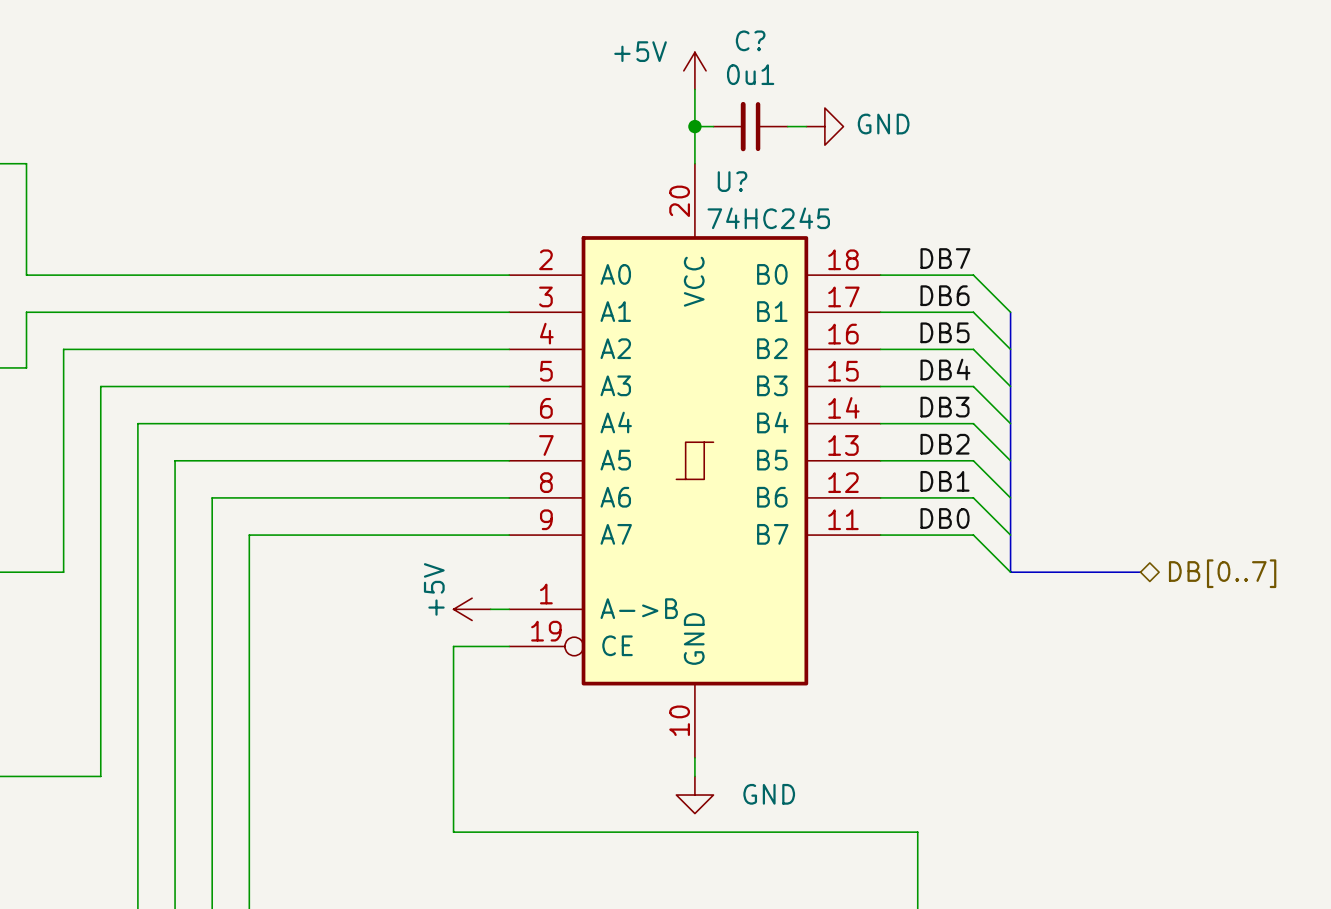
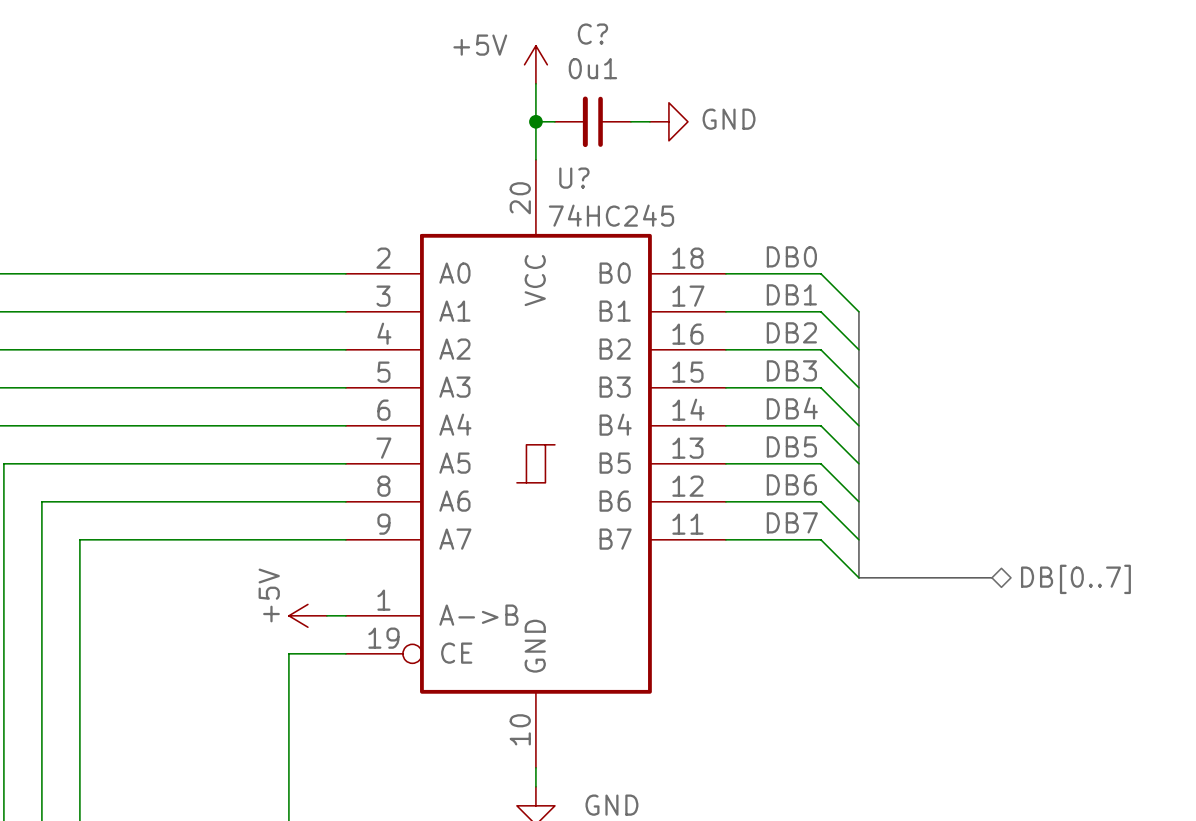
label: DB7 (945, 258) -> DB0 (791, 256)
label: DB6 (945, 295) -> DB1 (791, 294)
label: DB5 (945, 332) -> DB2 (791, 332)
label: DB4 (945, 369) -> DB3 (791, 370)
label: DB3 (945, 407) -> DB4 (792, 408)
label: DB2 (945, 444) -> DB5 (791, 446)
label: DB1 (945, 481) -> DB6 (791, 484)
label: DB0 (945, 518) -> DB7 (792, 522)

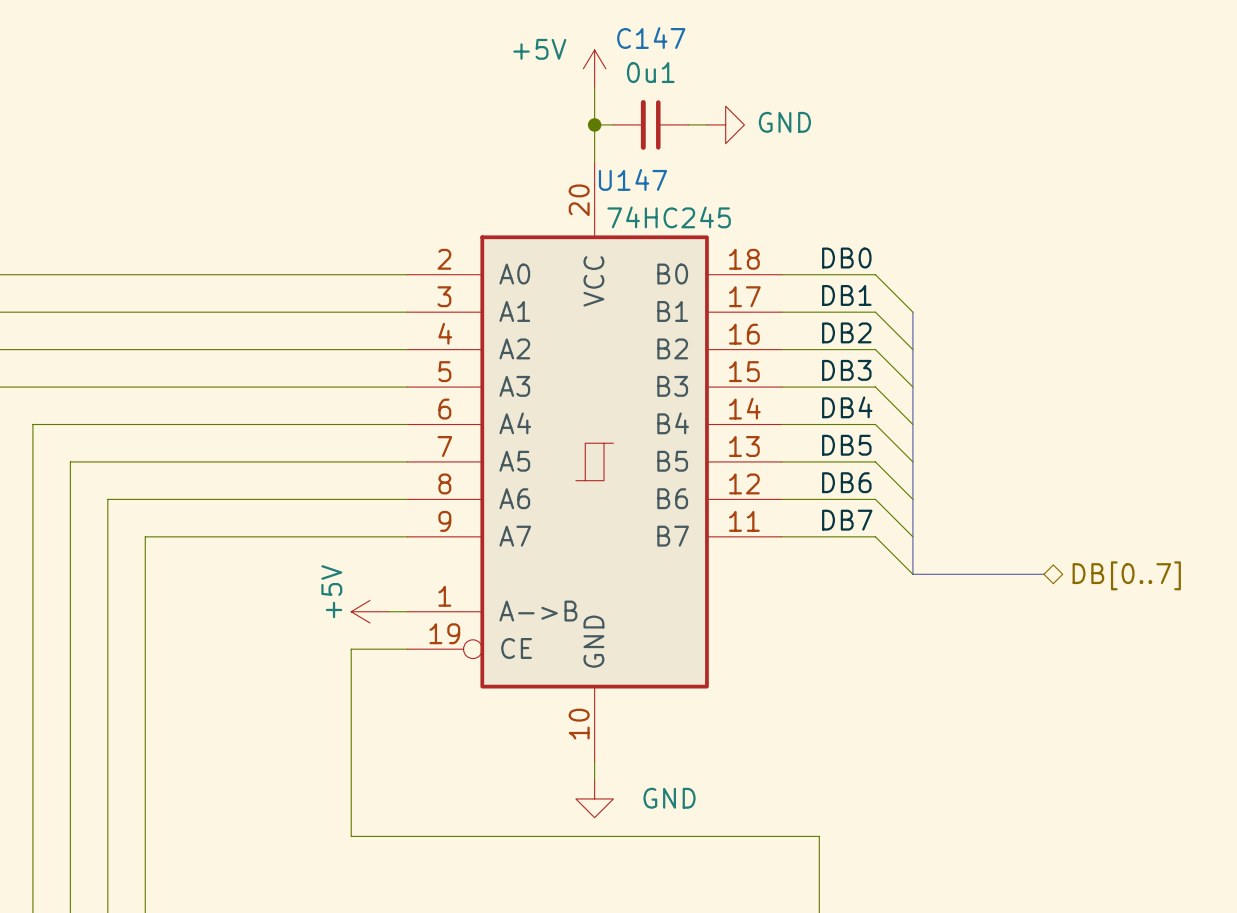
C? name: C? (592, 34) -> C147 (651, 38)
U? name: U? (574, 178) -> U147 (632, 179)

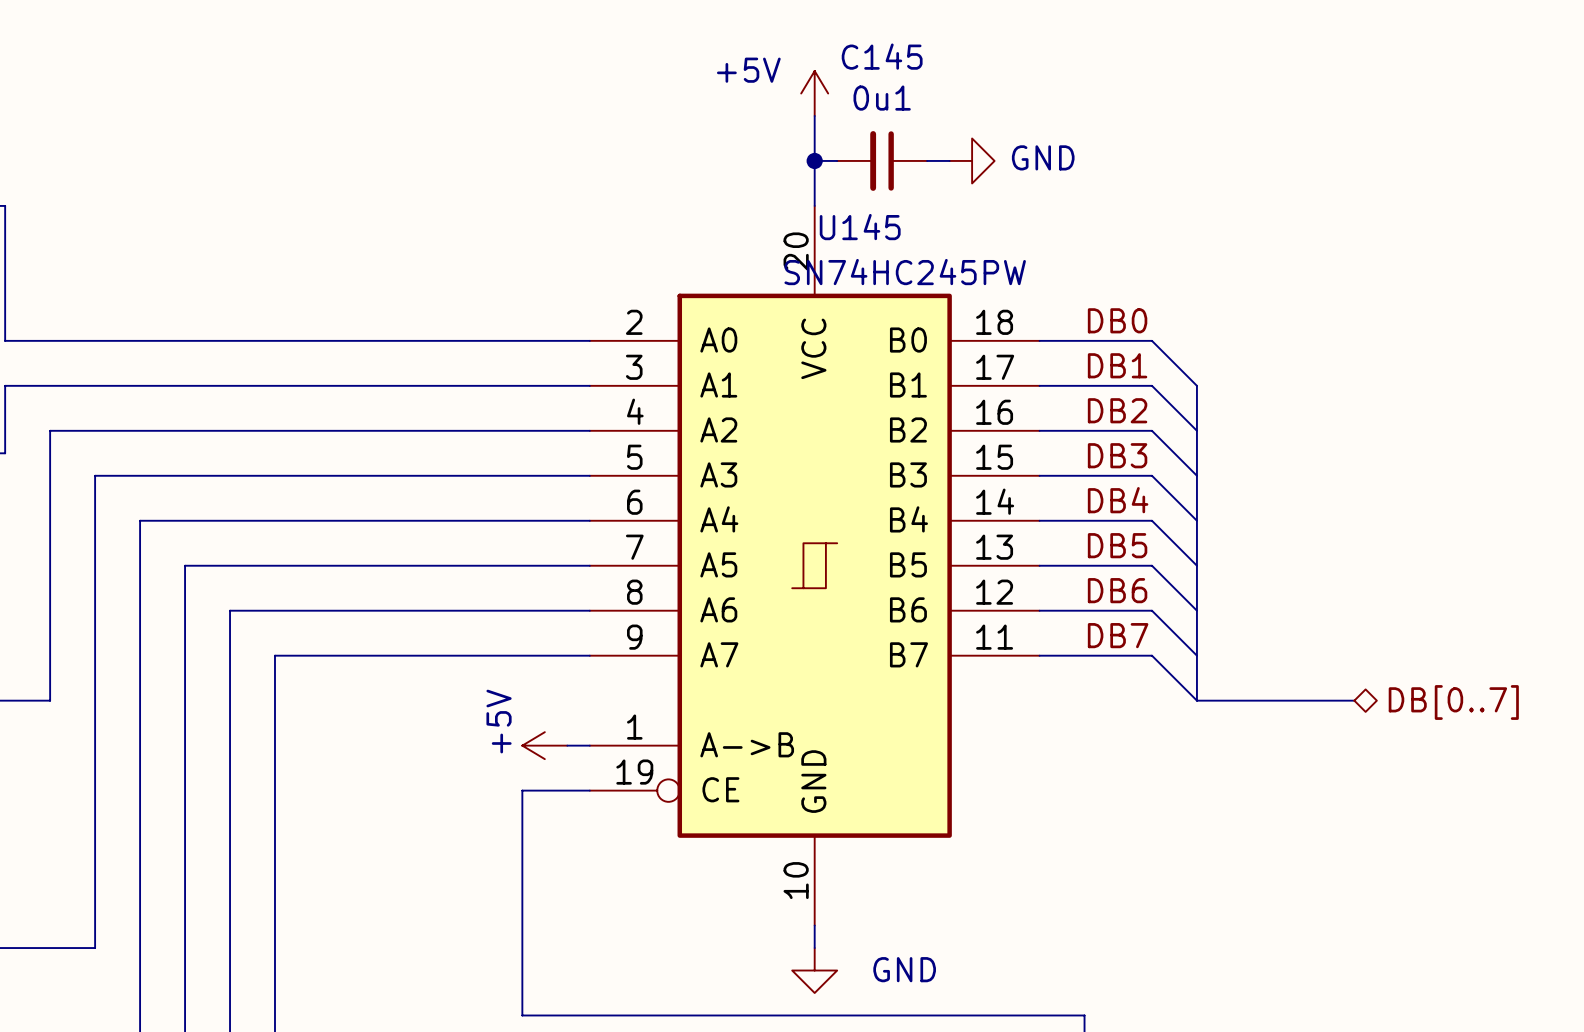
C147 name: C147 (651, 38) -> C145 (882, 56)
U147 name: U147 (632, 179) -> U145 (860, 227)
U147 value: 74HC245 (669, 217) -> SN74HC245PW (905, 272)

